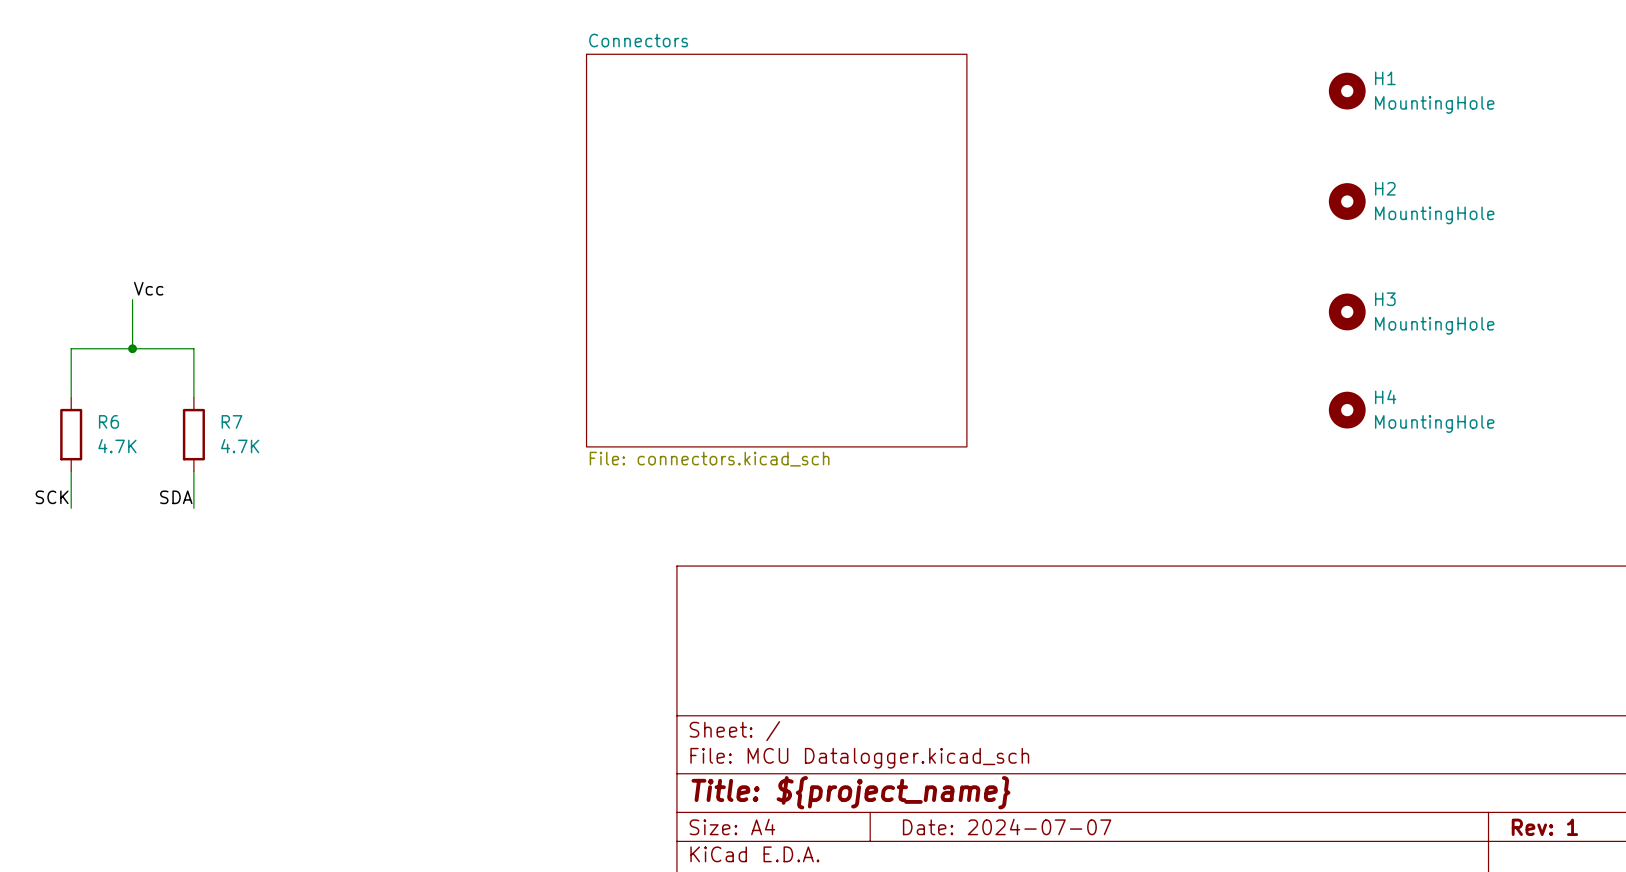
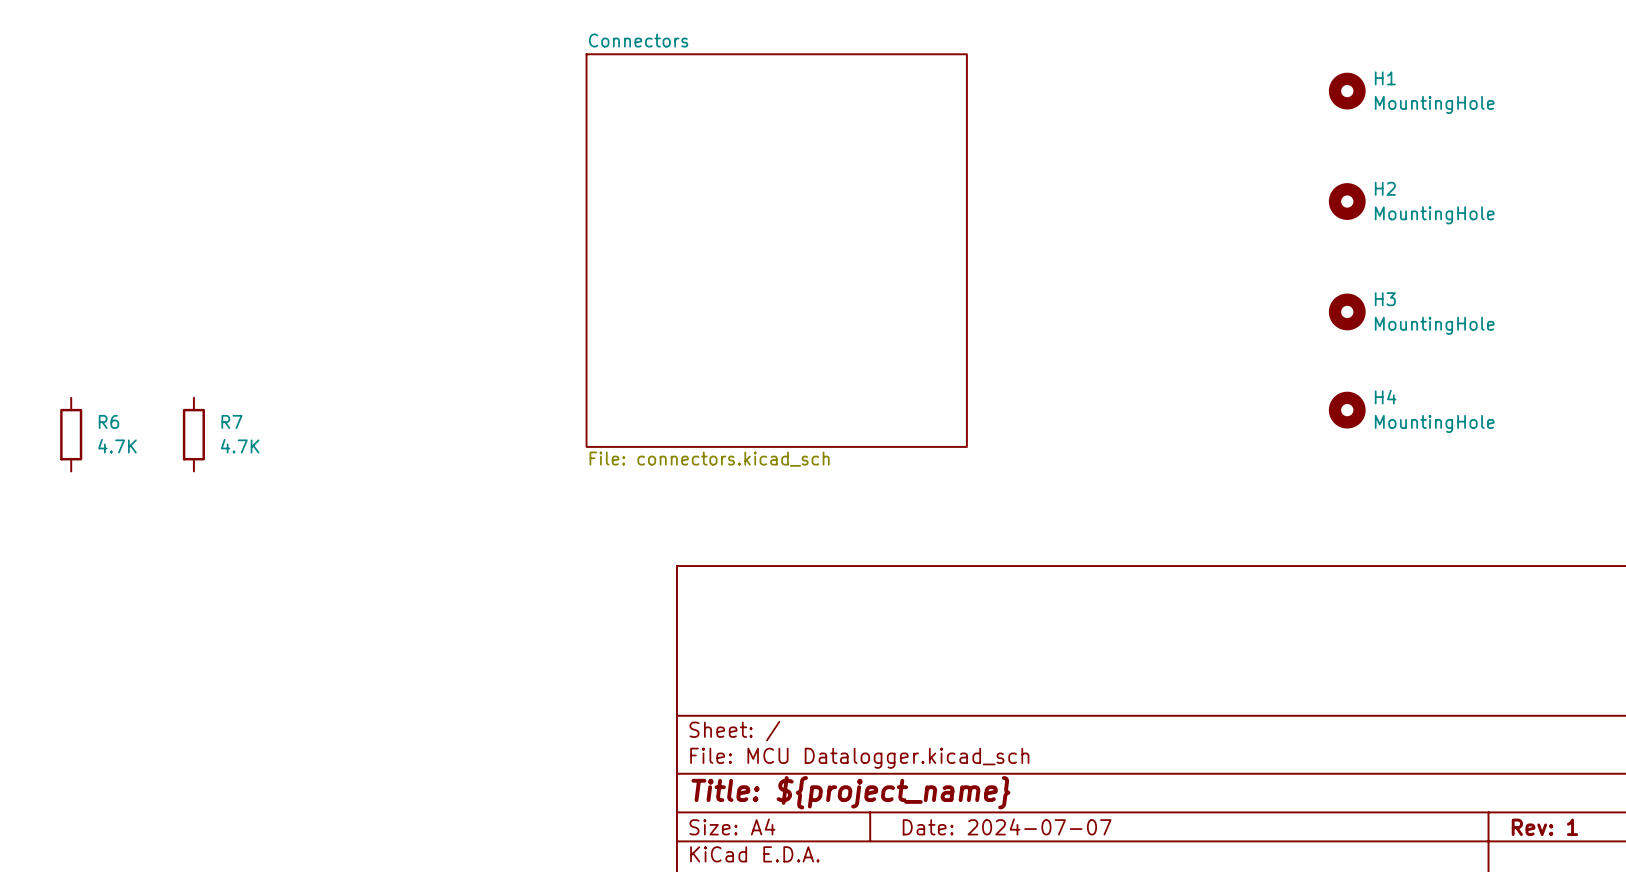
label: Vcc (148, 288) -> none
wire: (132, 299) (132, 348) -> none
junction: (132, 348) -> none
wire: (71, 397) (71, 348) (193, 348) (193, 397) -> none
wire: (71, 471) (71, 508) -> none
wire: (193, 471) (193, 508) -> none
label: SCK (52, 497) -> none
label: SDA (176, 497) -> none

